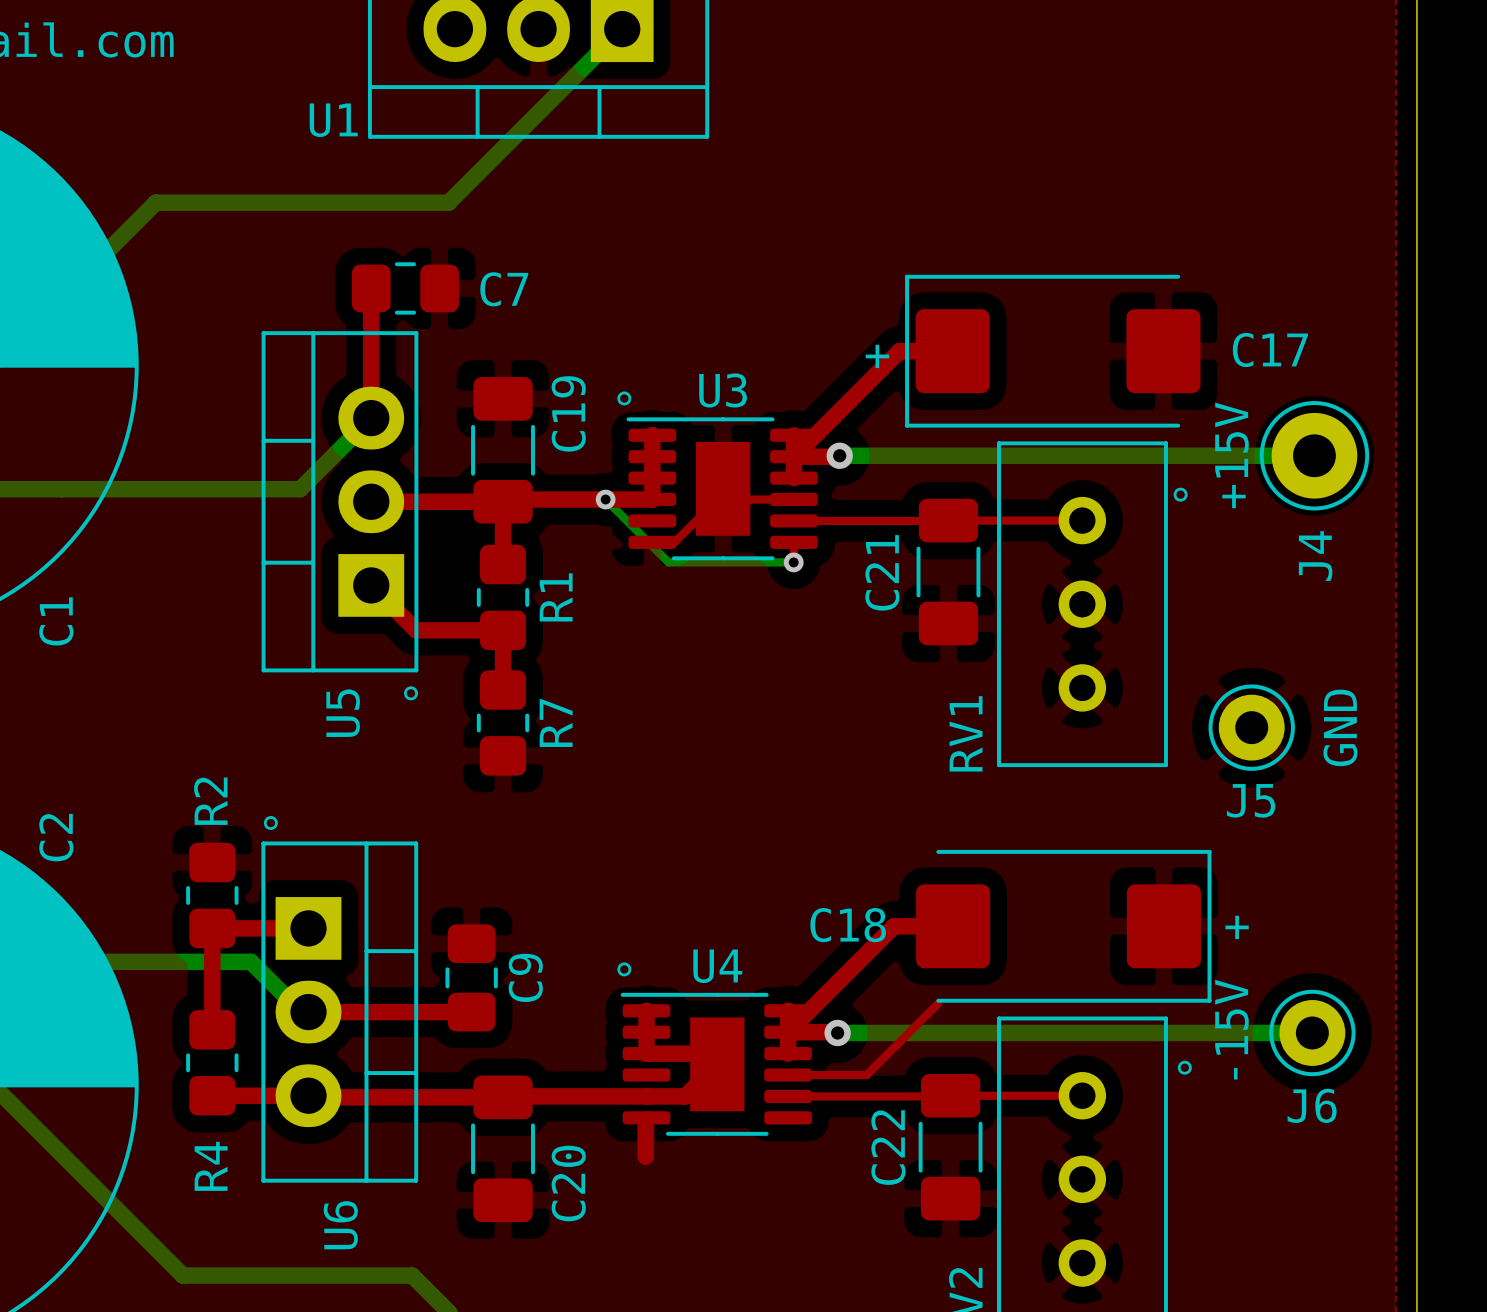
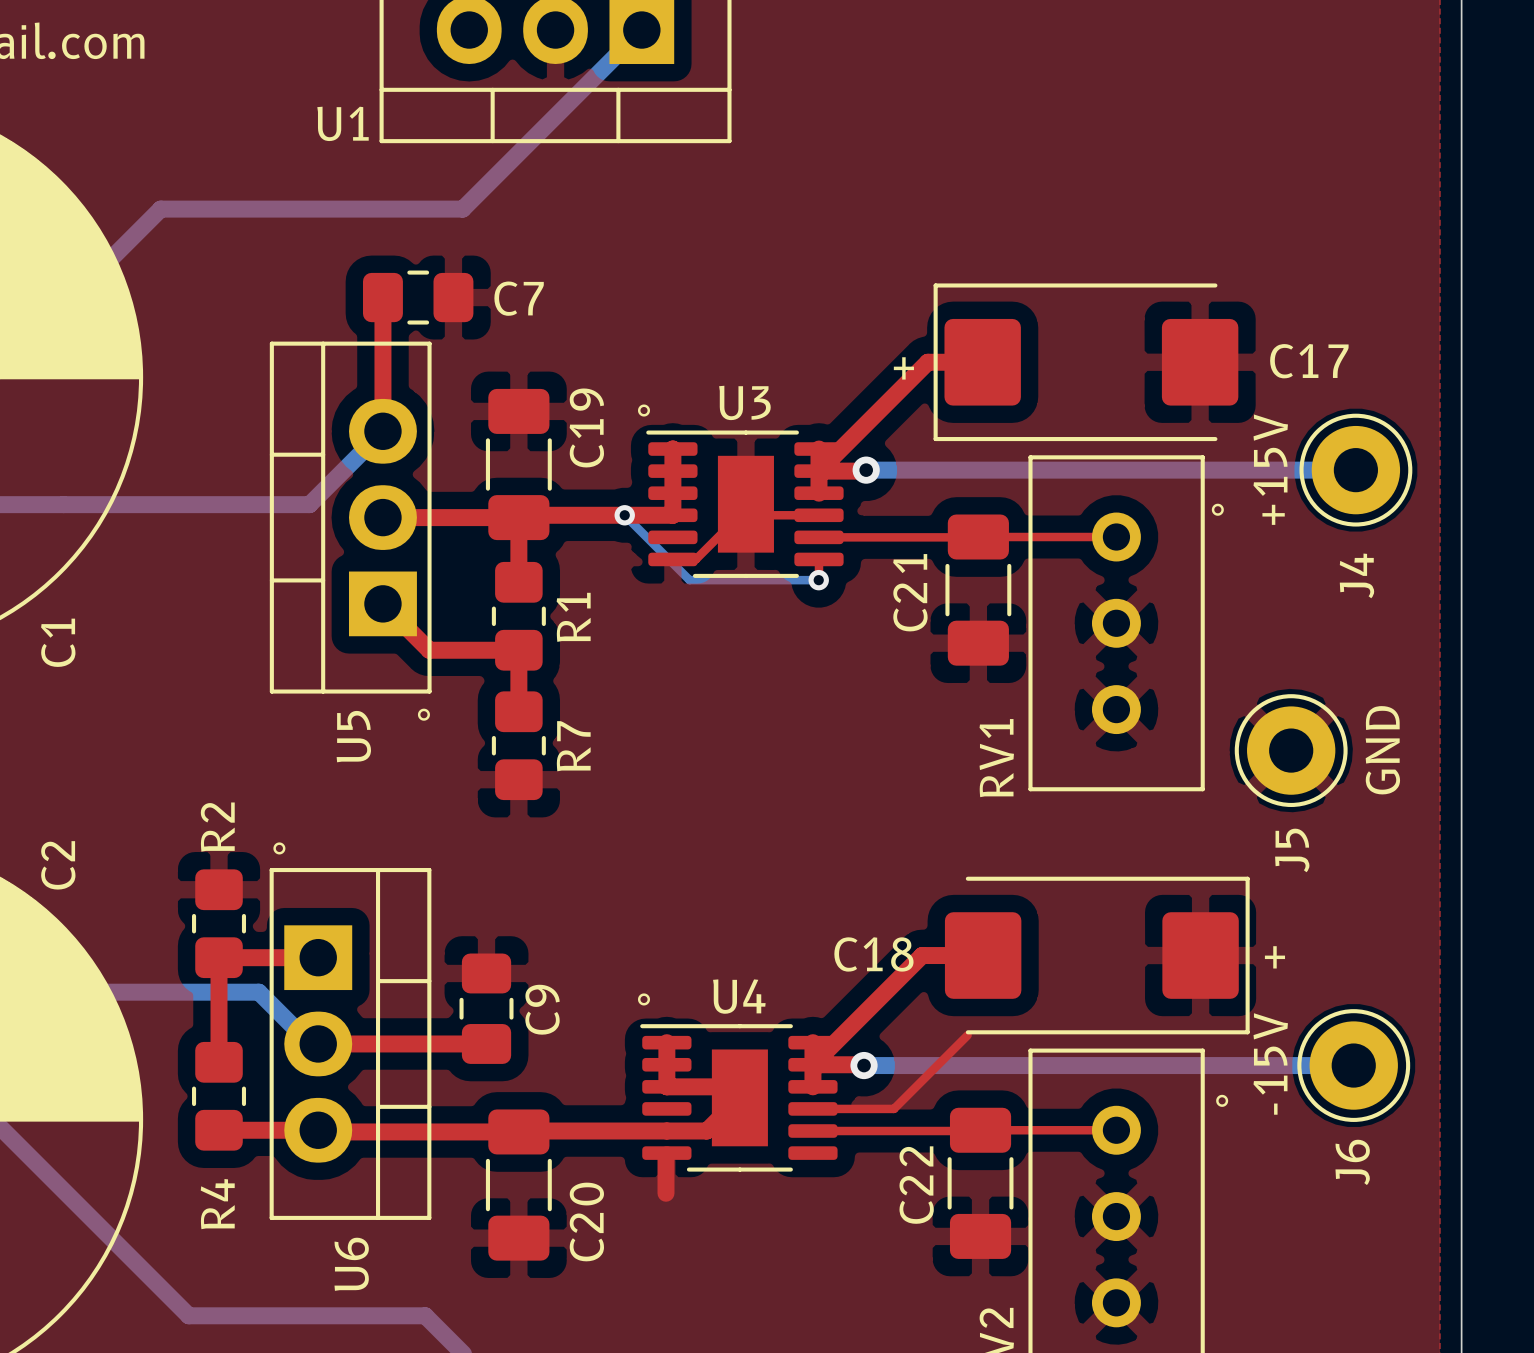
J5 footprint: [1208, 684, 1295, 771] -> [1234, 694, 1348, 808]
J5 name rotation: 0° (1251, 800) -> 90° counterclockwise (1292, 850)
J6 footprint: [1269, 989, 1356, 1077] -> [1297, 1009, 1411, 1122]
J6 name rotation: 0° (1312, 1105) -> 90° counterclockwise (1352, 1162)

